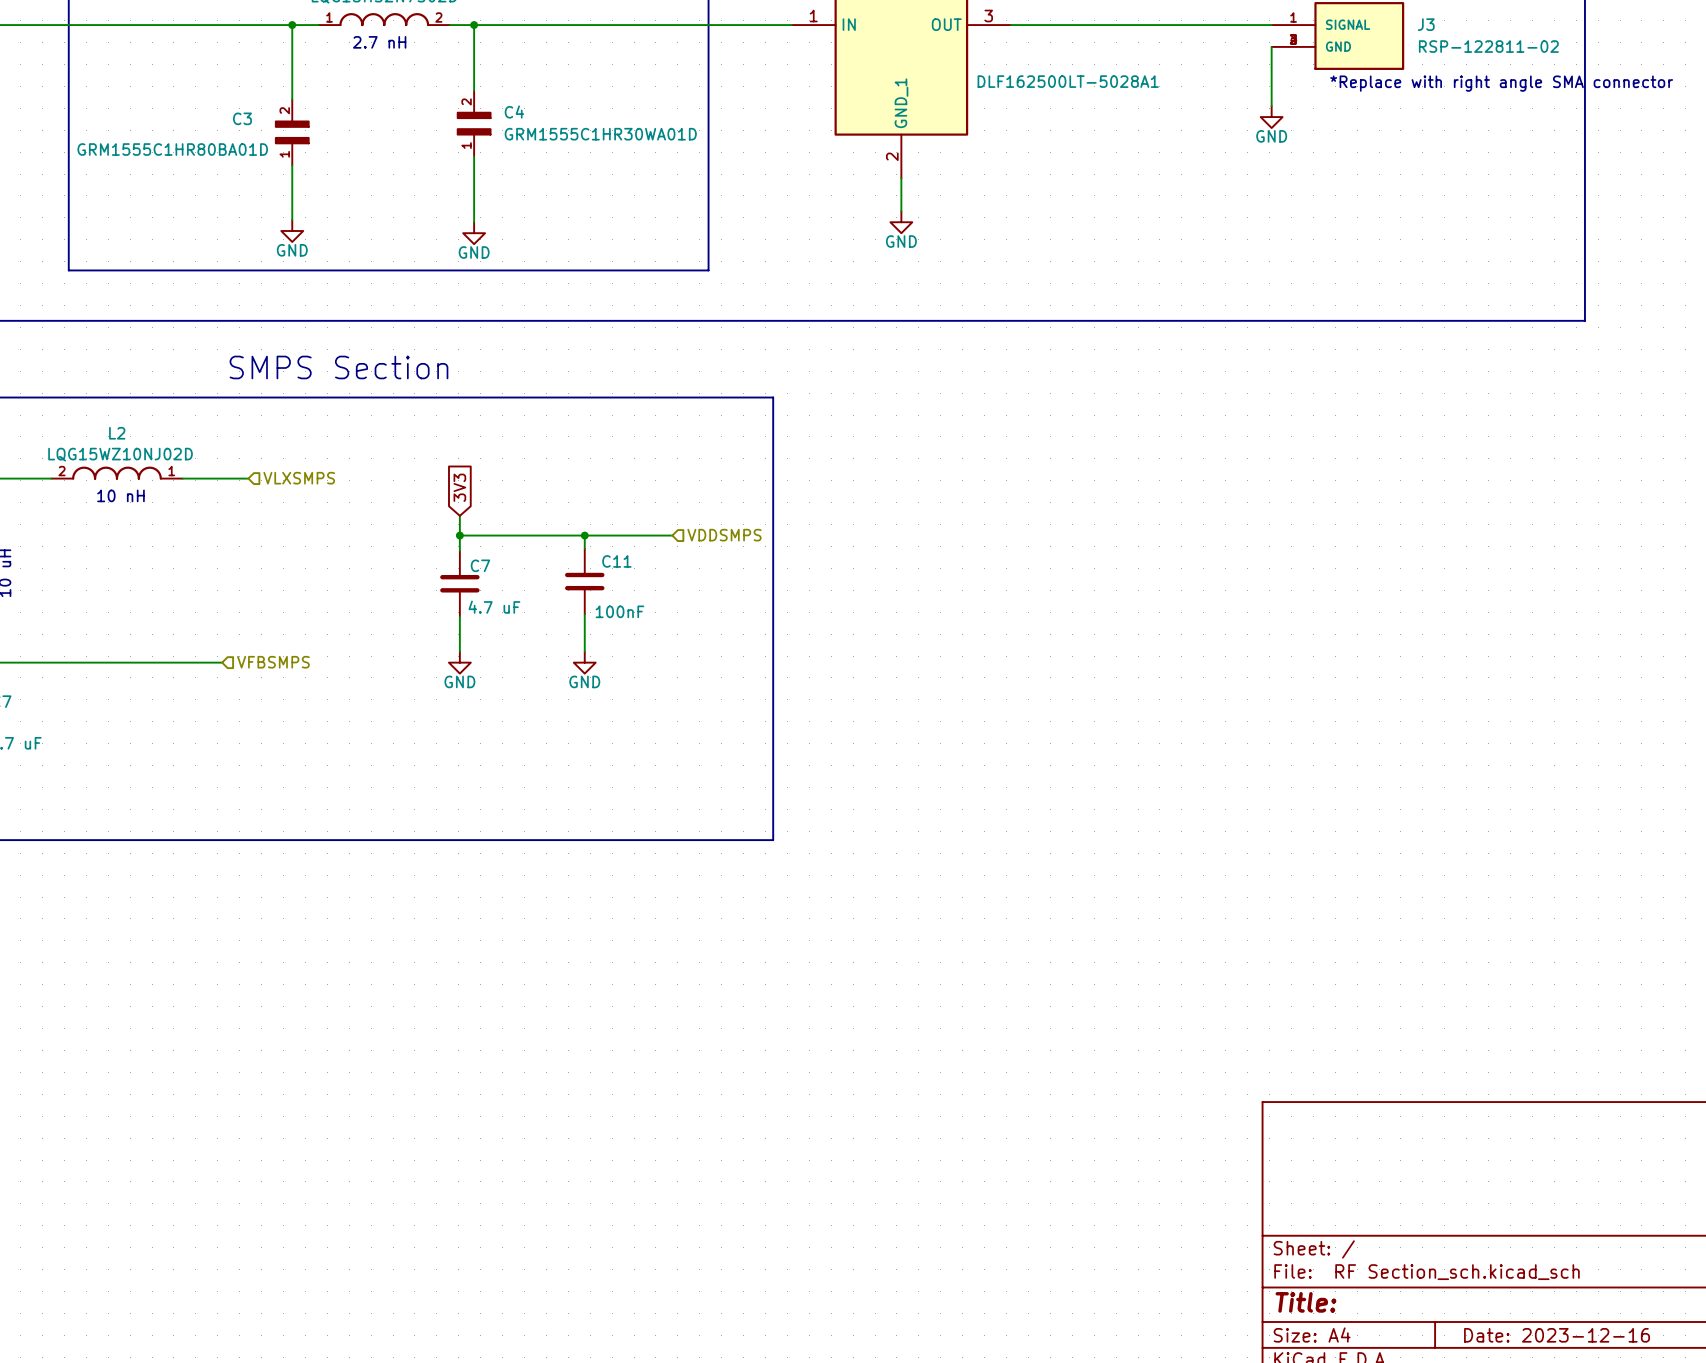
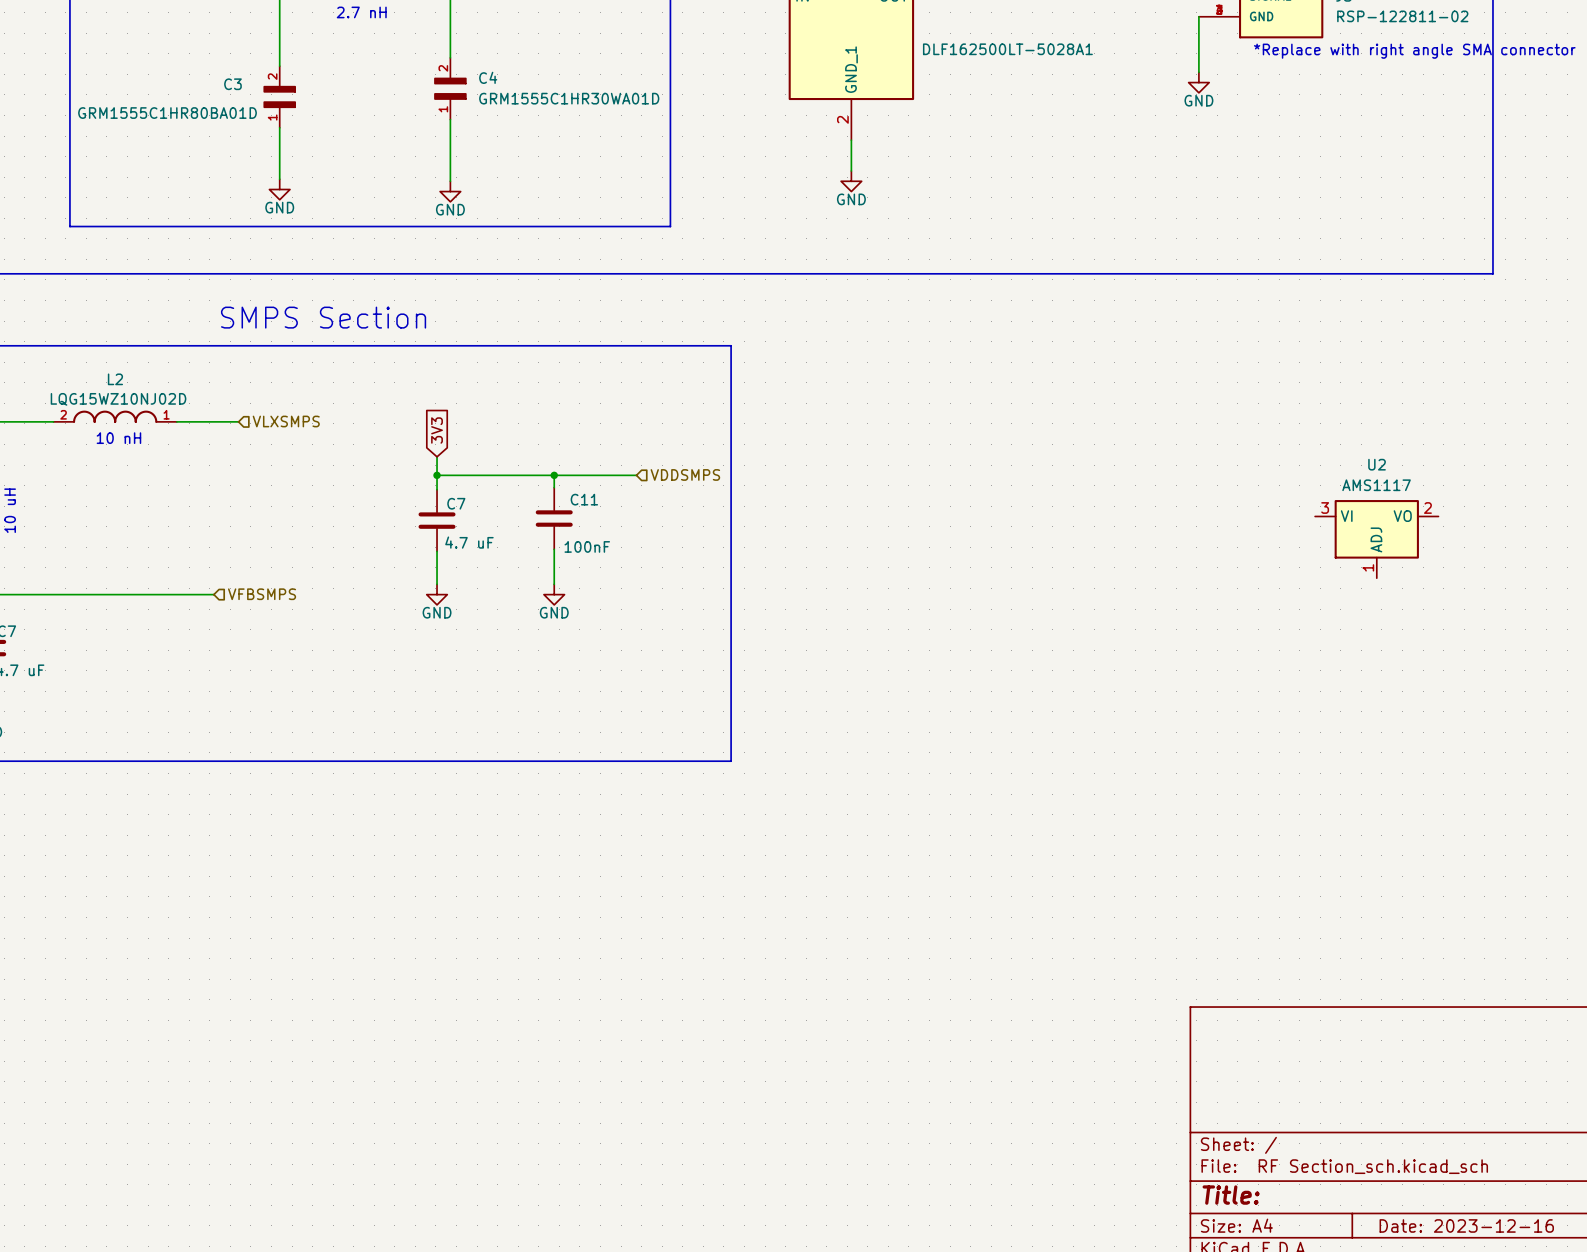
U2: none -> AMS1117 (1376, 539)

